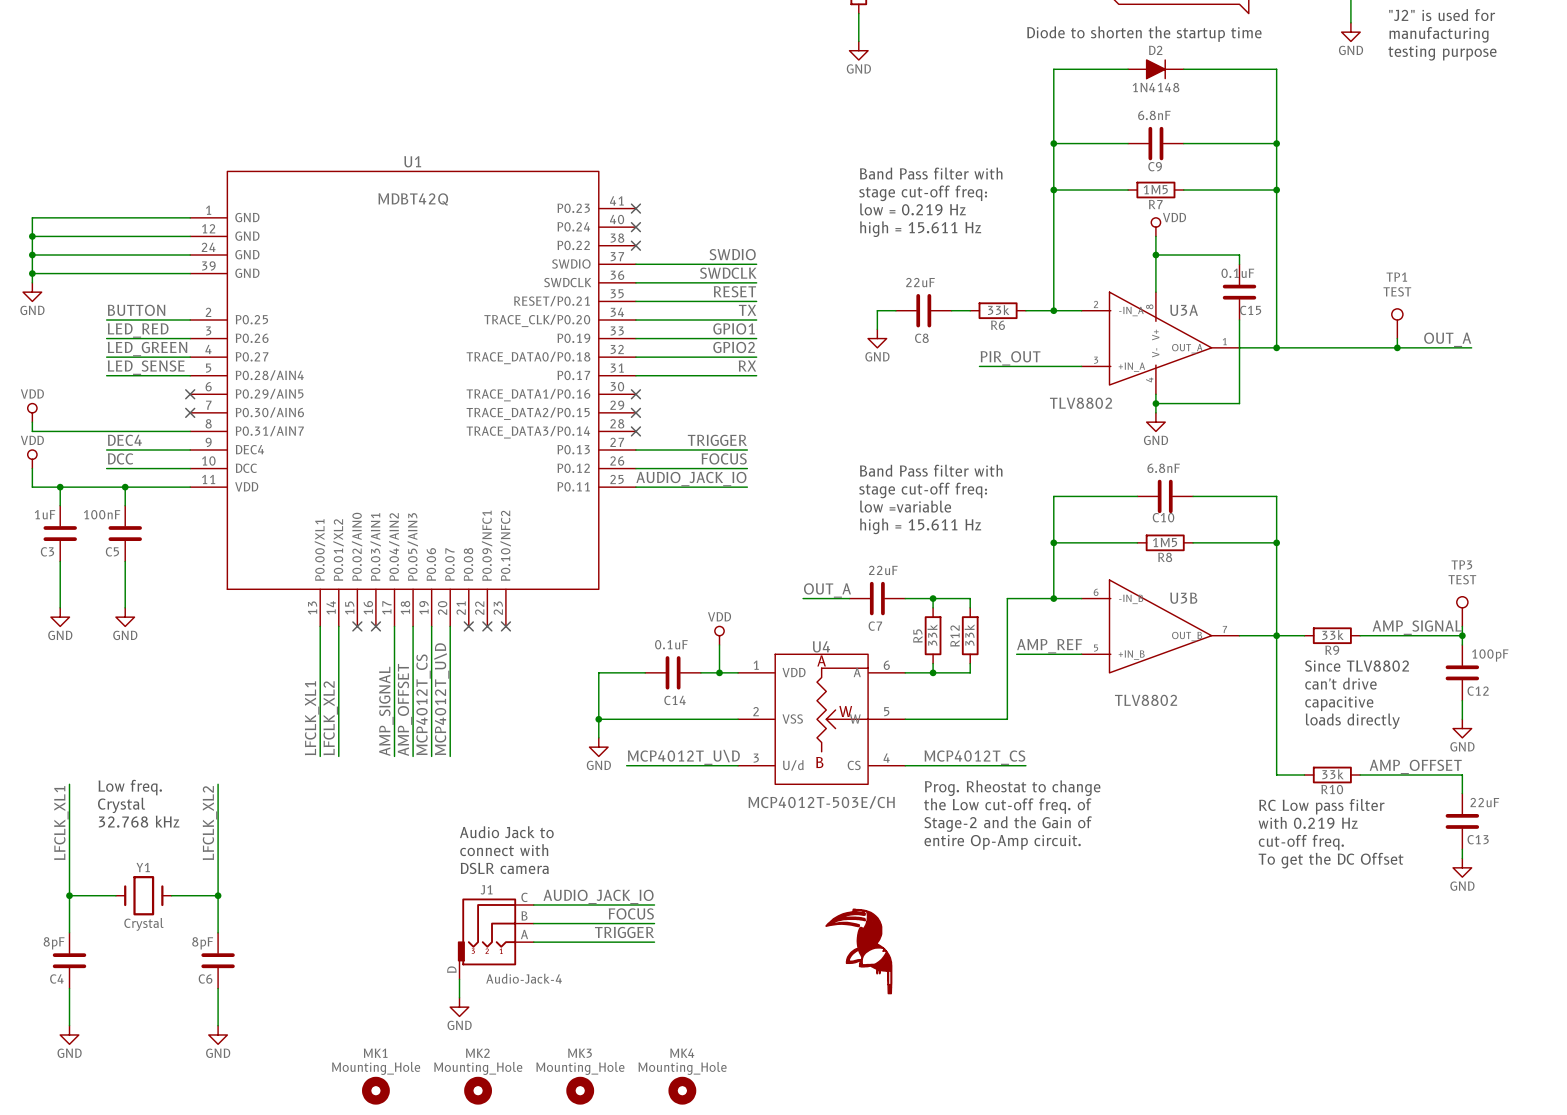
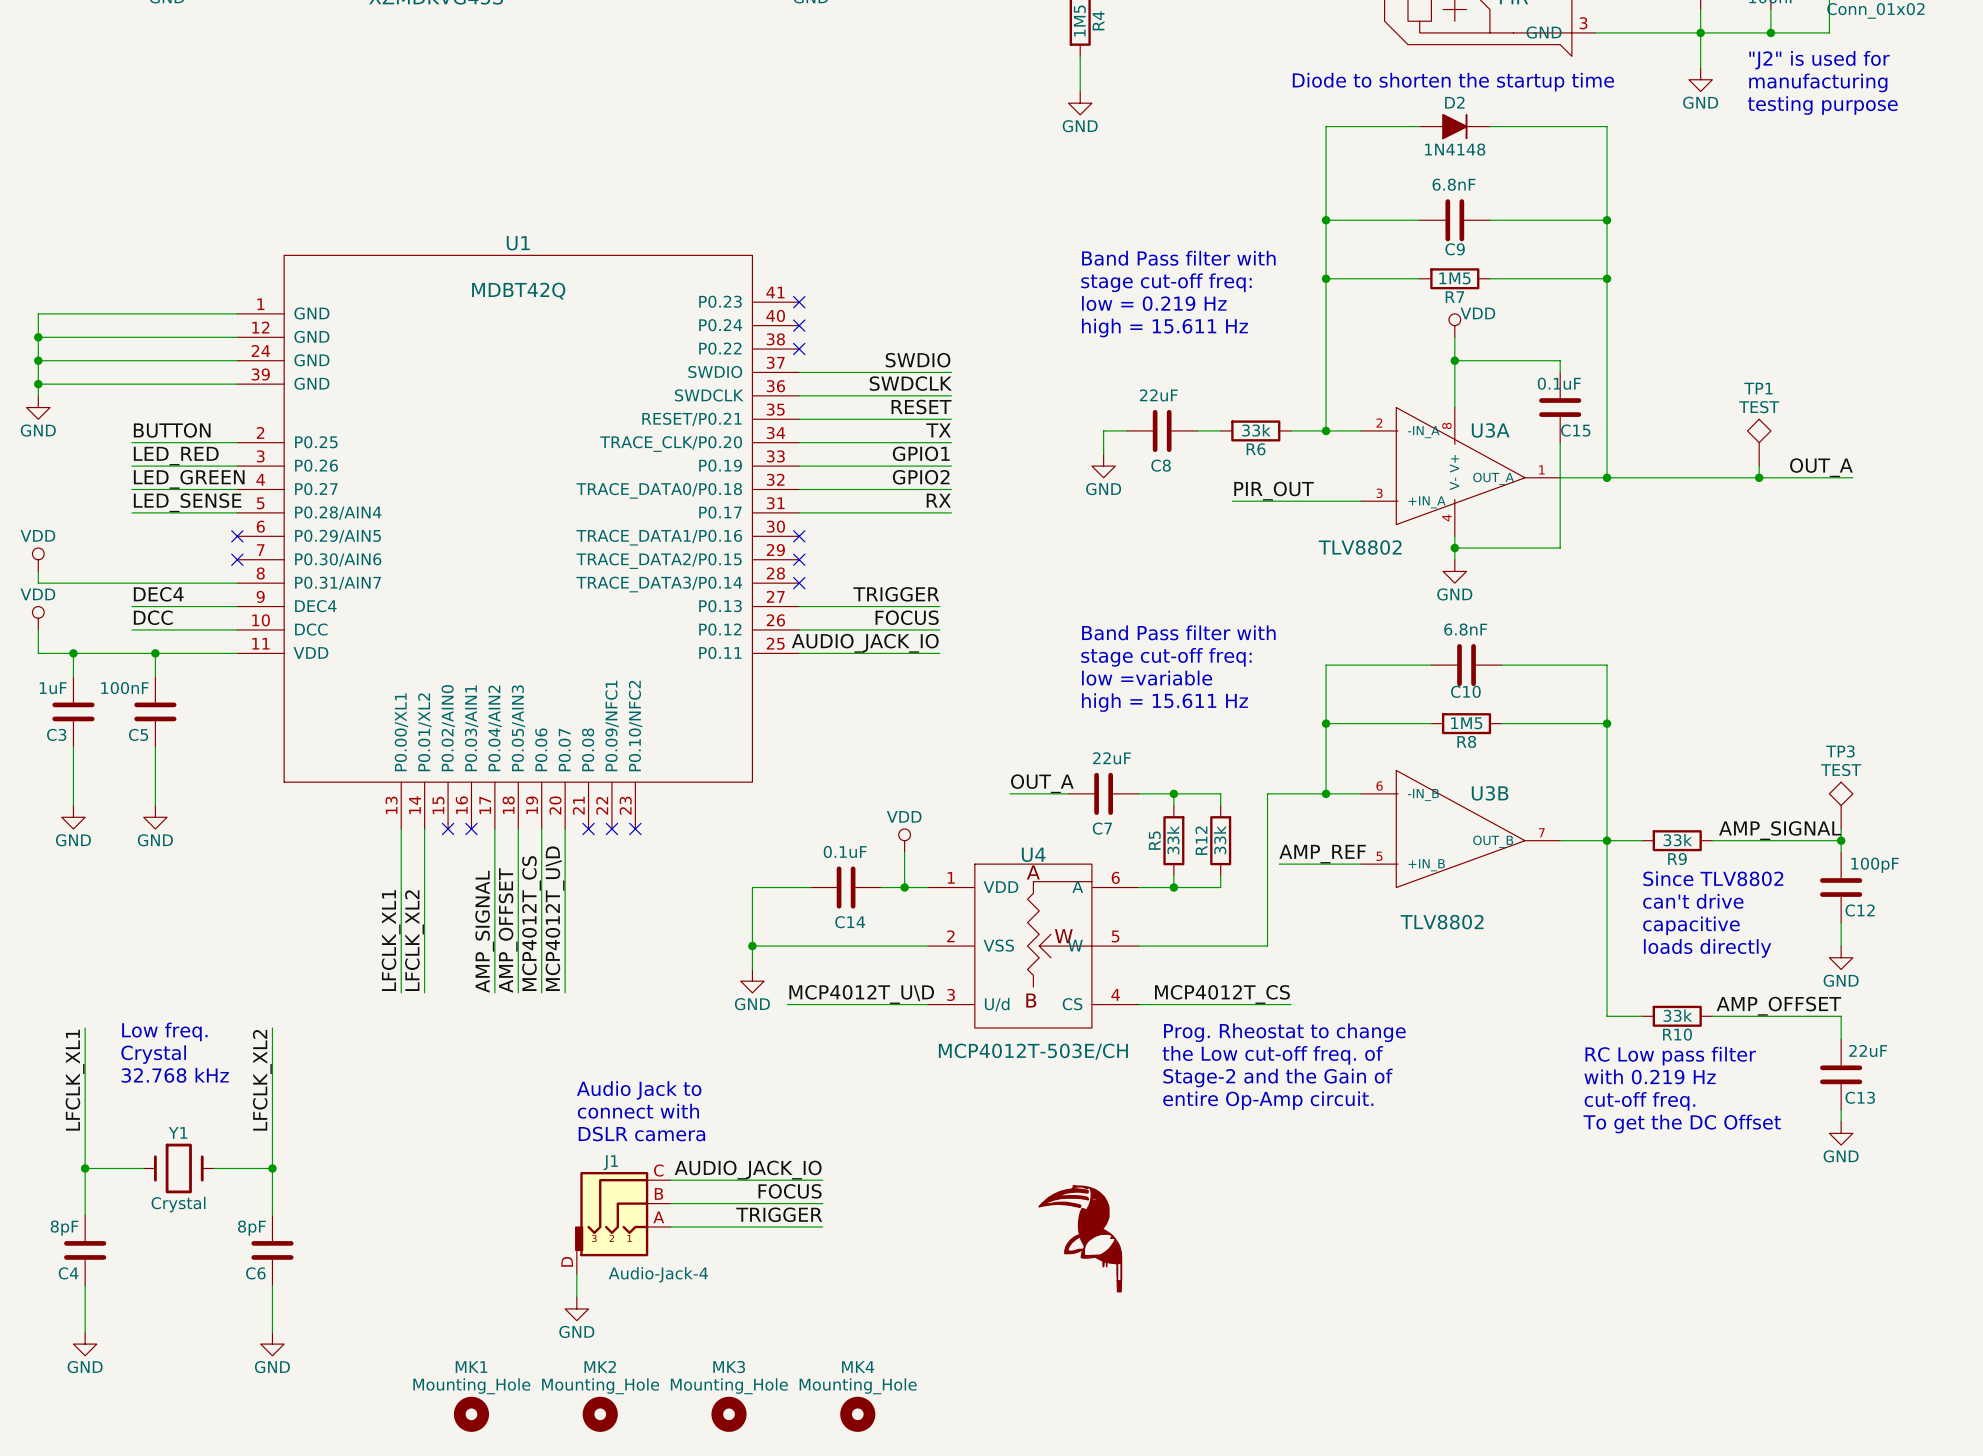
TP1 symbol: [1391, 308, 1403, 339] -> [1747, 419, 1771, 467]
TP3 symbol: [1456, 596, 1468, 627] -> [1829, 782, 1853, 829]

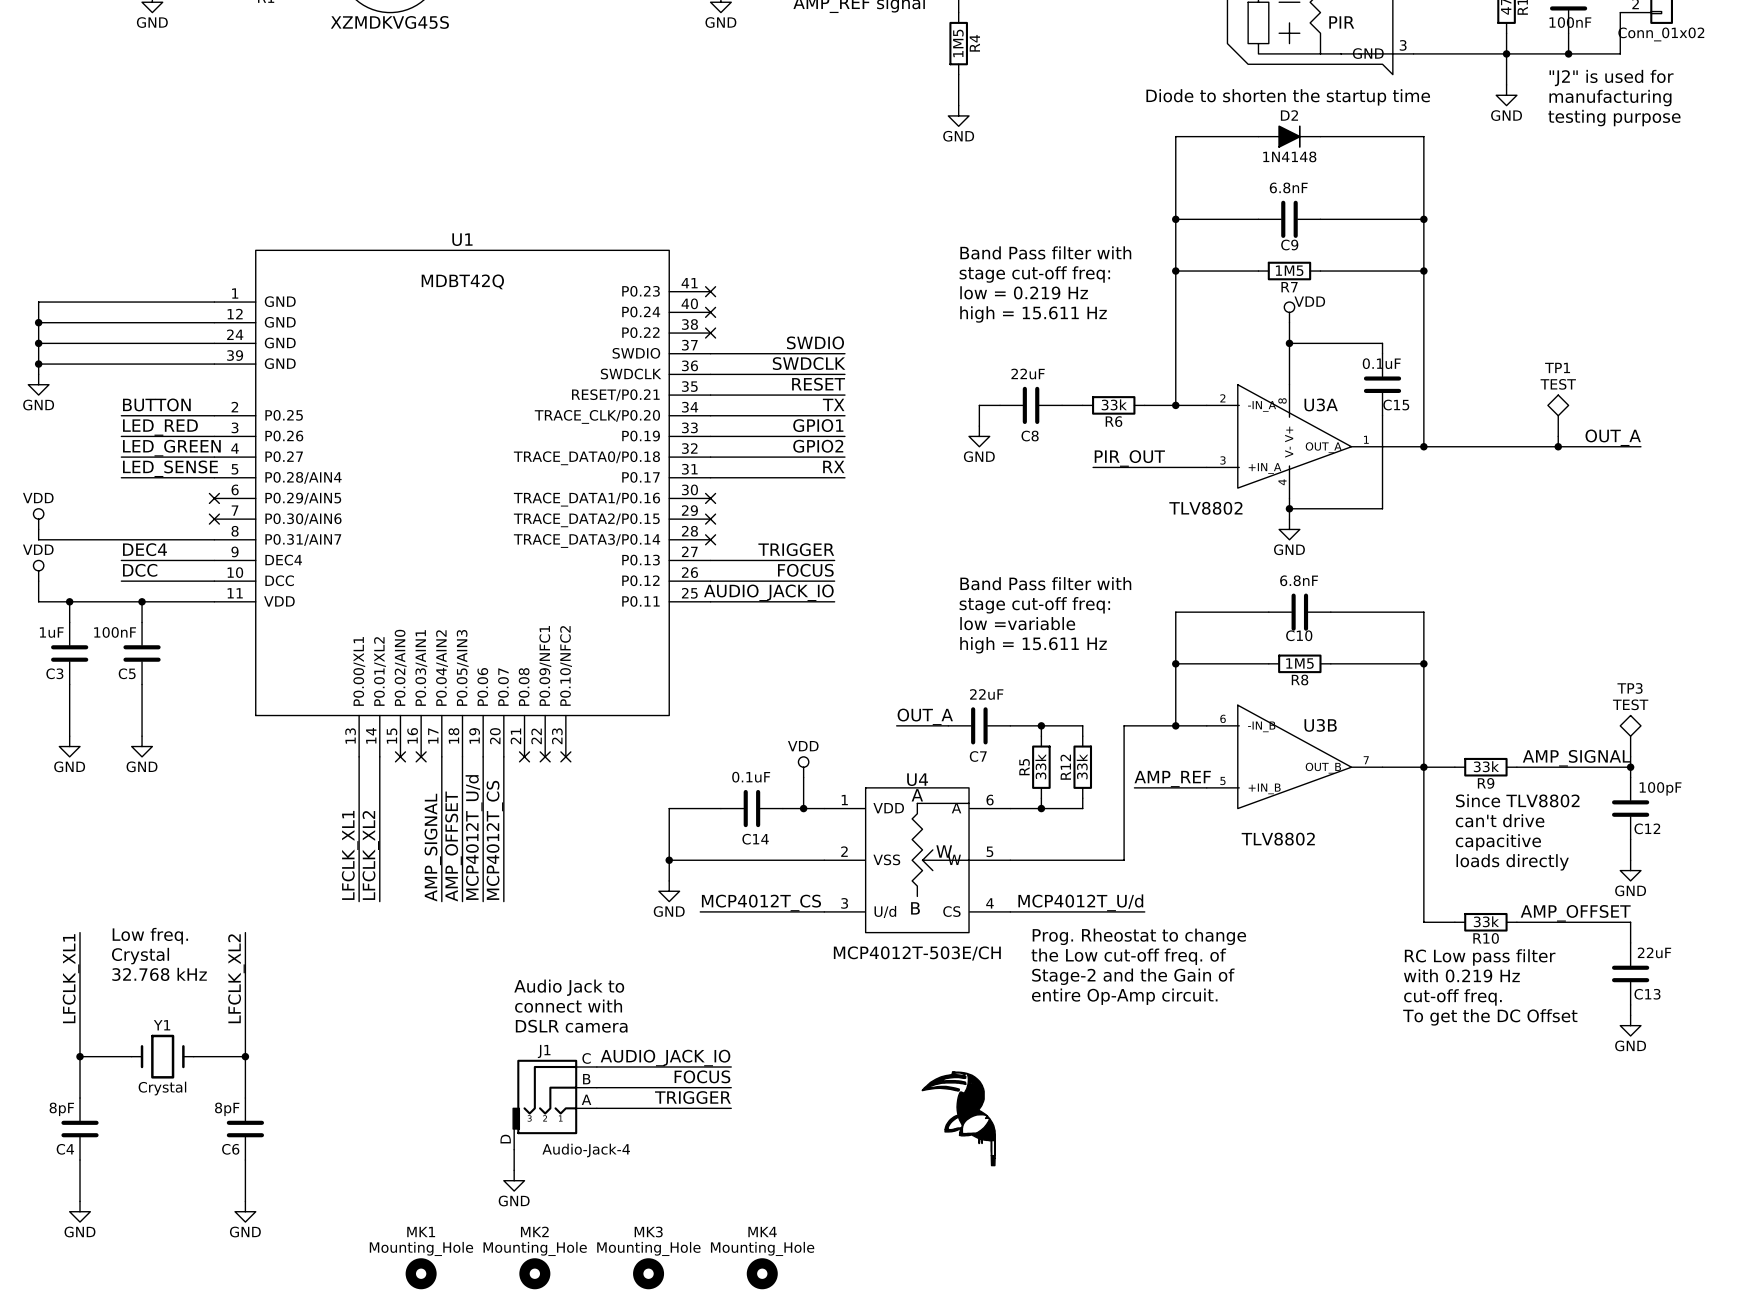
label: MCP4012T_U\D (555, 918) -> MCP4012T_CS (494, 840)
label: MCP4012T_CS (531, 923) -> MCP4012T_U/d (474, 837)
label: MCP4012T_U\D (861, 994) -> MCP4012T_CS (761, 903)
label: MCP4012T_CS (1222, 994) -> MCP4012T_U/d (1080, 902)

